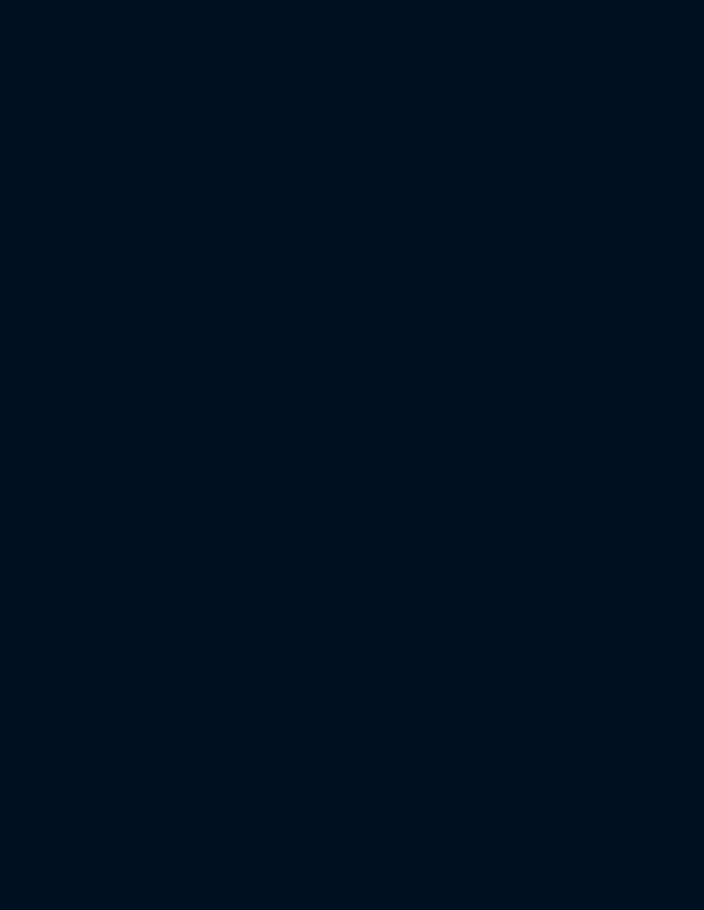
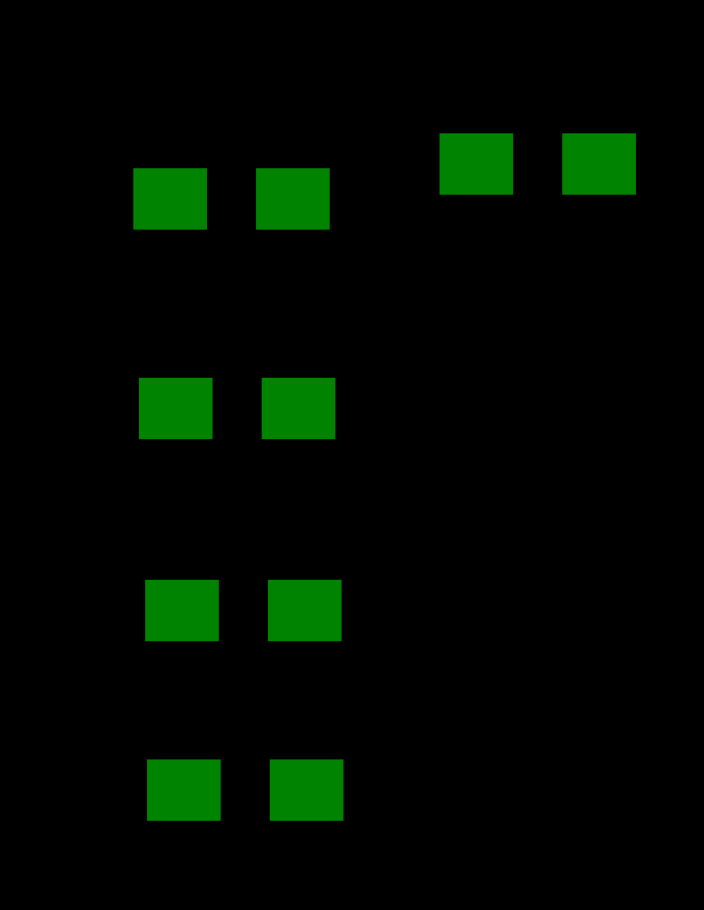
part: none -> (537, 164)
part: none -> (231, 198)
part: none -> (237, 408)
part: none -> (243, 610)
part: none -> (245, 790)

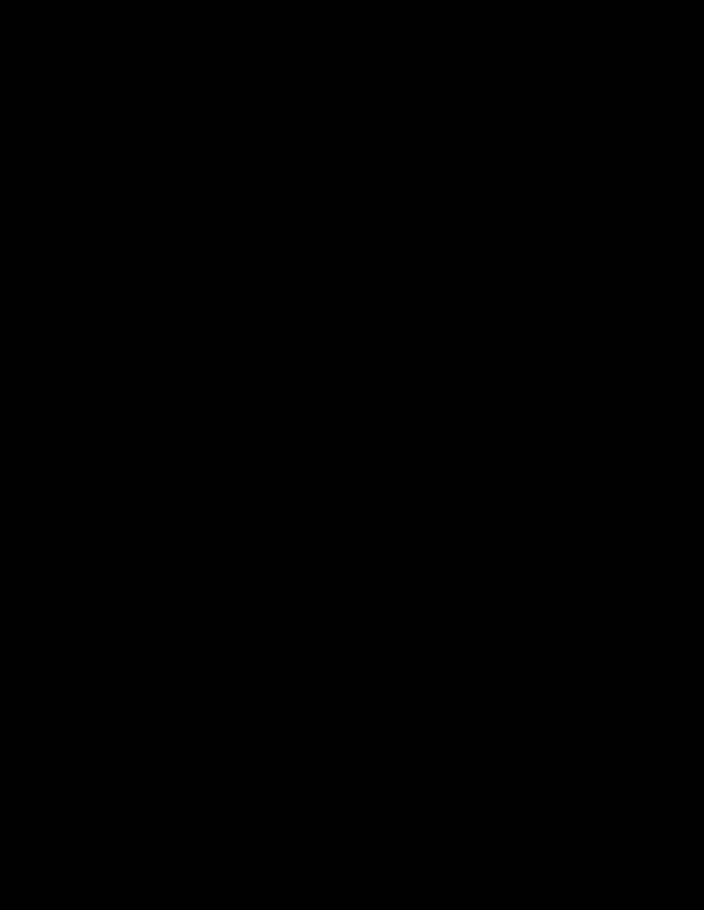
part: (537, 164) -> none
part: (231, 198) -> none
part: (237, 408) -> none
part: (243, 610) -> none
part: (245, 790) -> none

